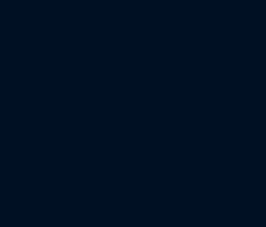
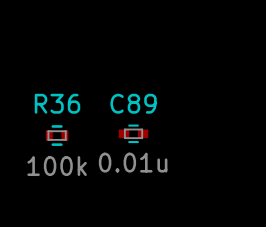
C89: none -> 0.01u (133, 133)
R36: none -> 100k (57, 135)

